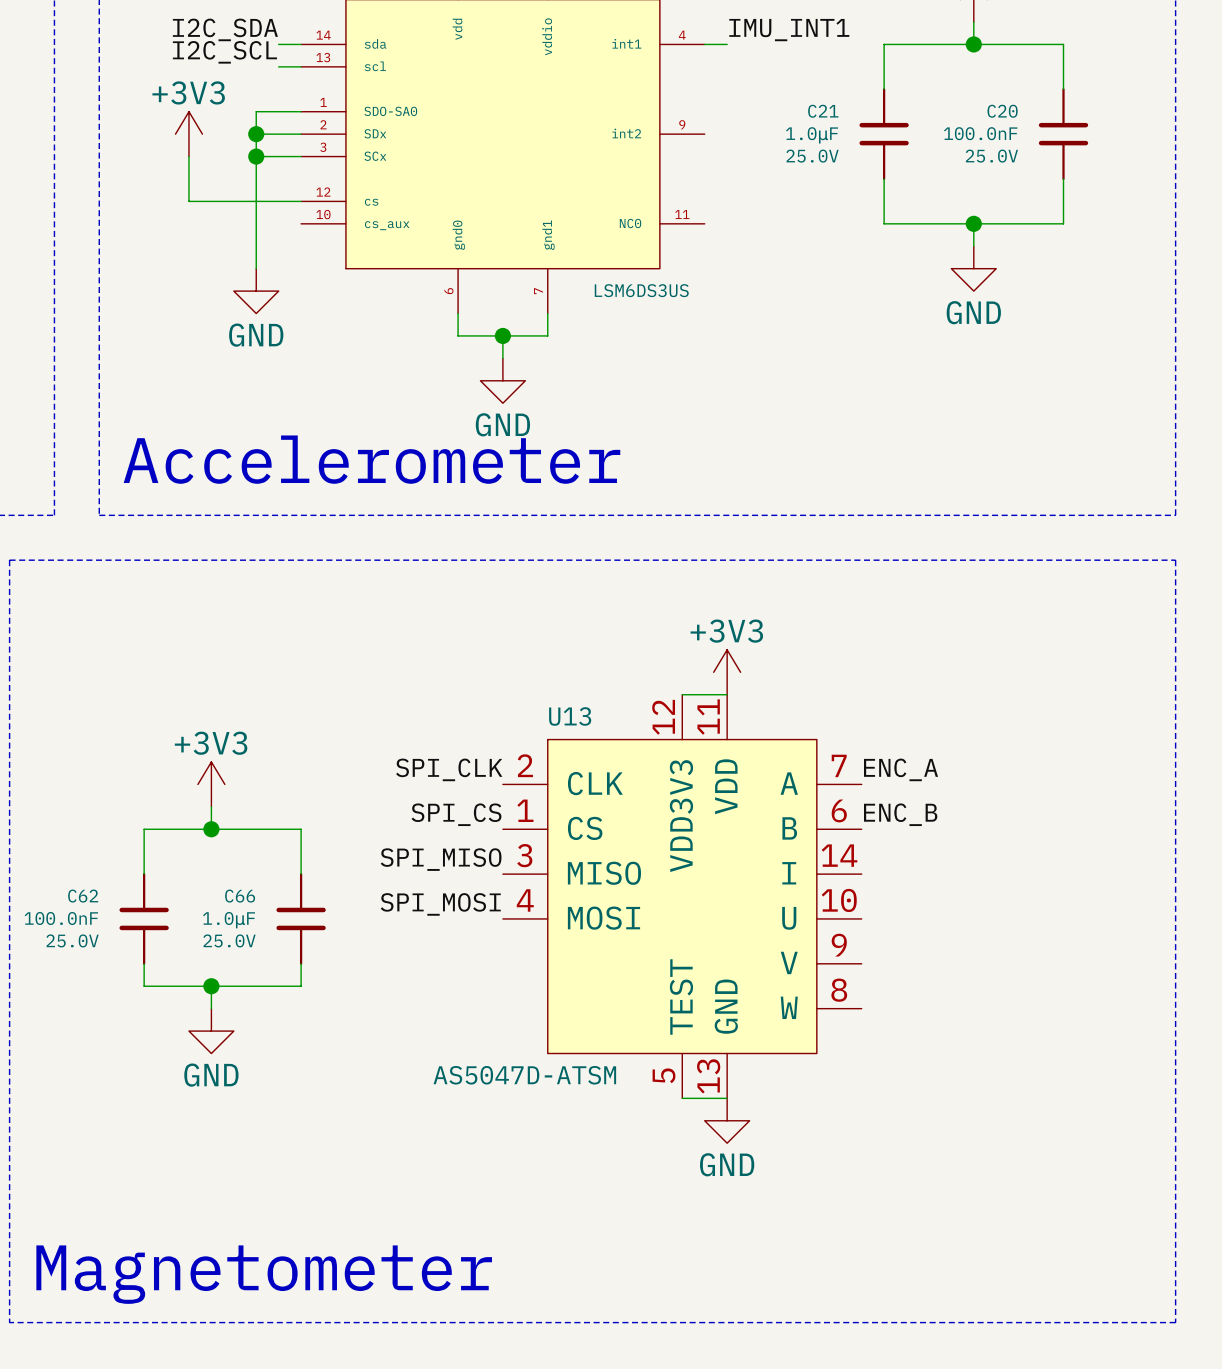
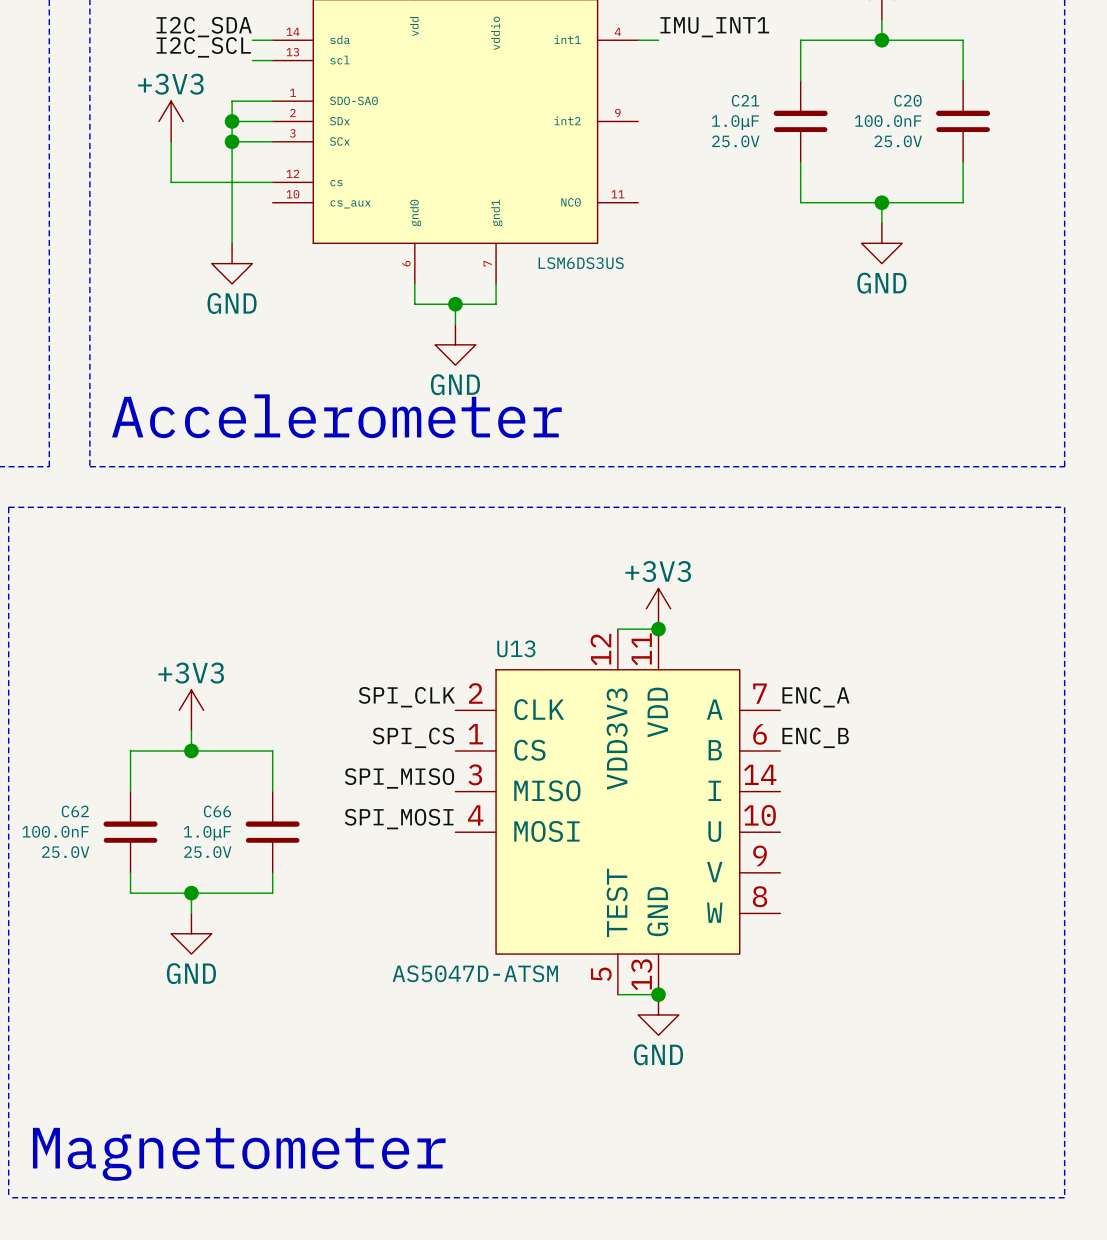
C21 symbol: [859, 88, 909, 181] -> [773, 80, 828, 163]
C20 symbol: [1038, 88, 1089, 181] -> [936, 80, 991, 163]
junction: none -> (658, 629)
C62 symbol: [119, 872, 169, 965] -> [103, 791, 158, 873]
C66 symbol: [276, 872, 326, 965] -> [245, 791, 300, 873]
junction: none -> (658, 994)

